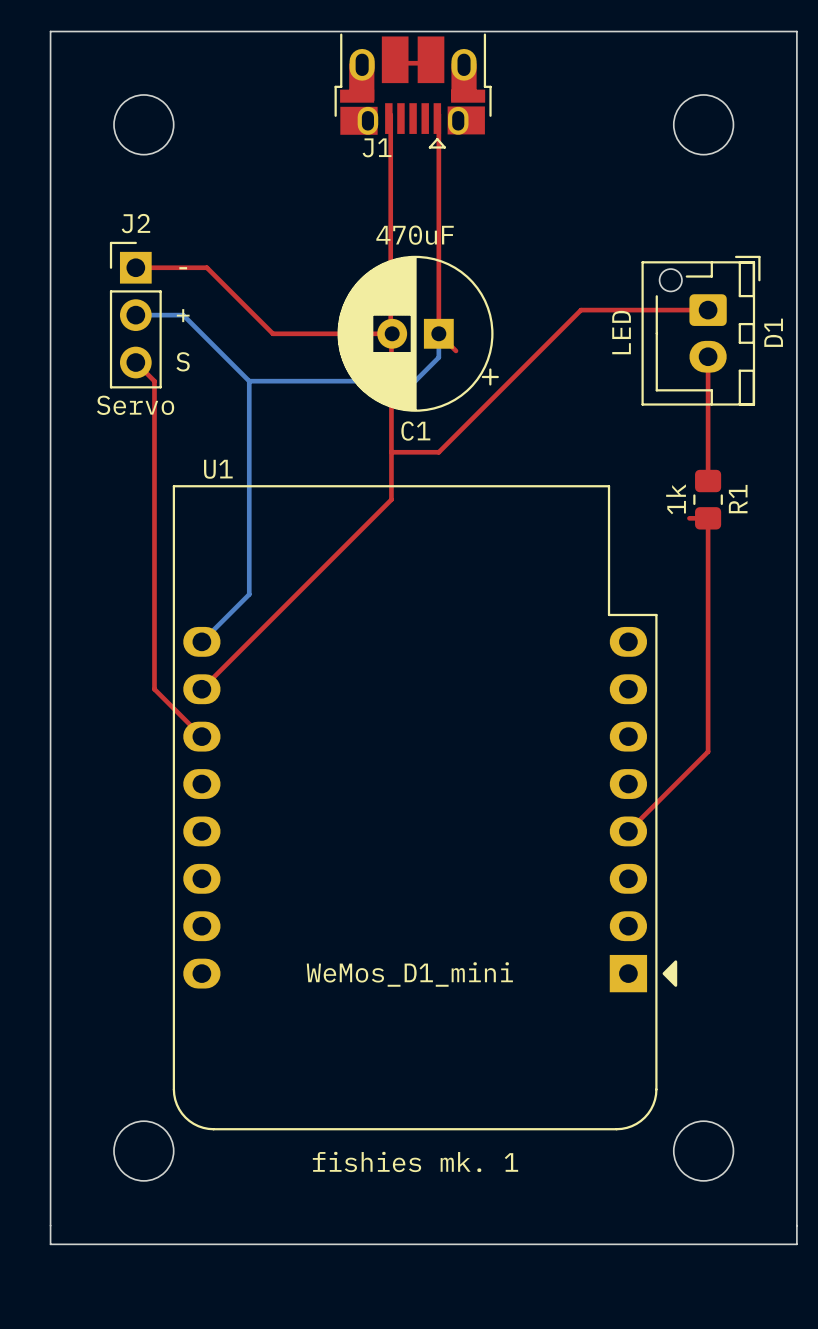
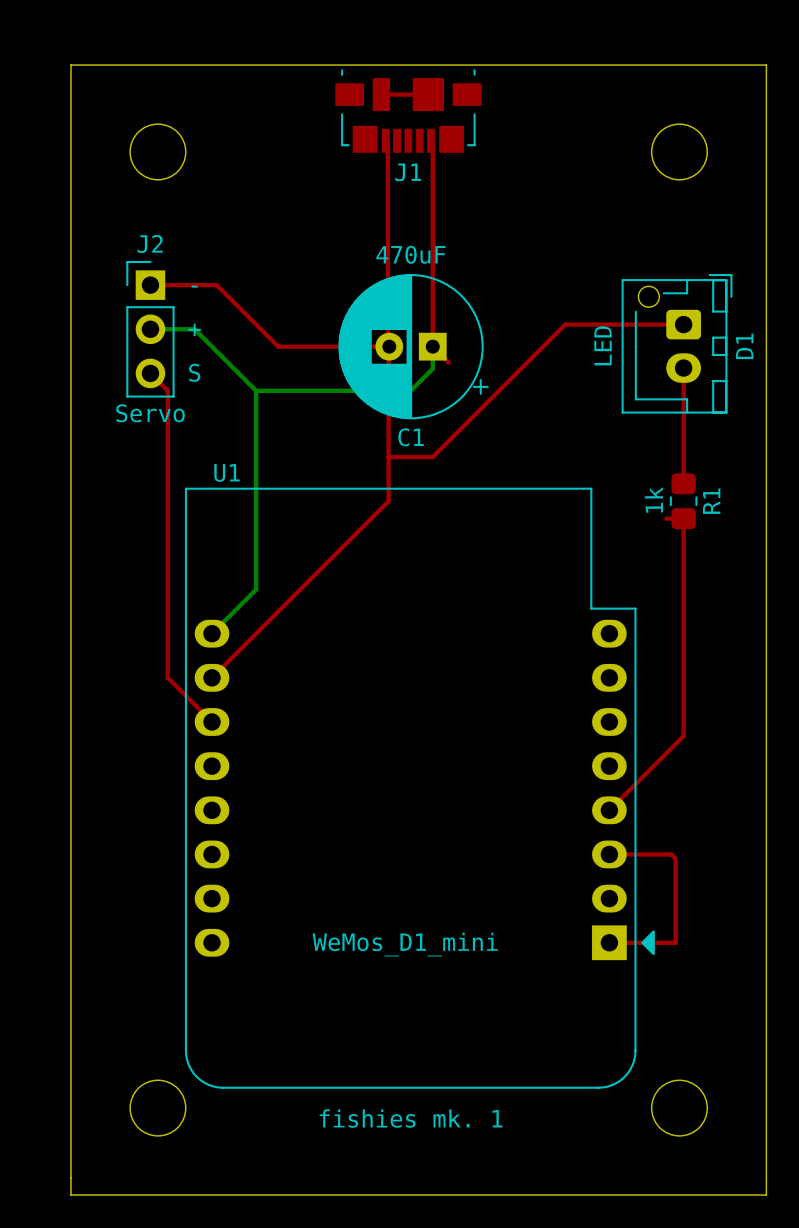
J1 footprint: [334, 33, 492, 149] -> [335, 69, 482, 153]
J1 name position: J1 (377, 147) -> J1 (408, 172)
top track: none -> (609, 854) (671, 854) (675, 858) (675, 942) (609, 942)

